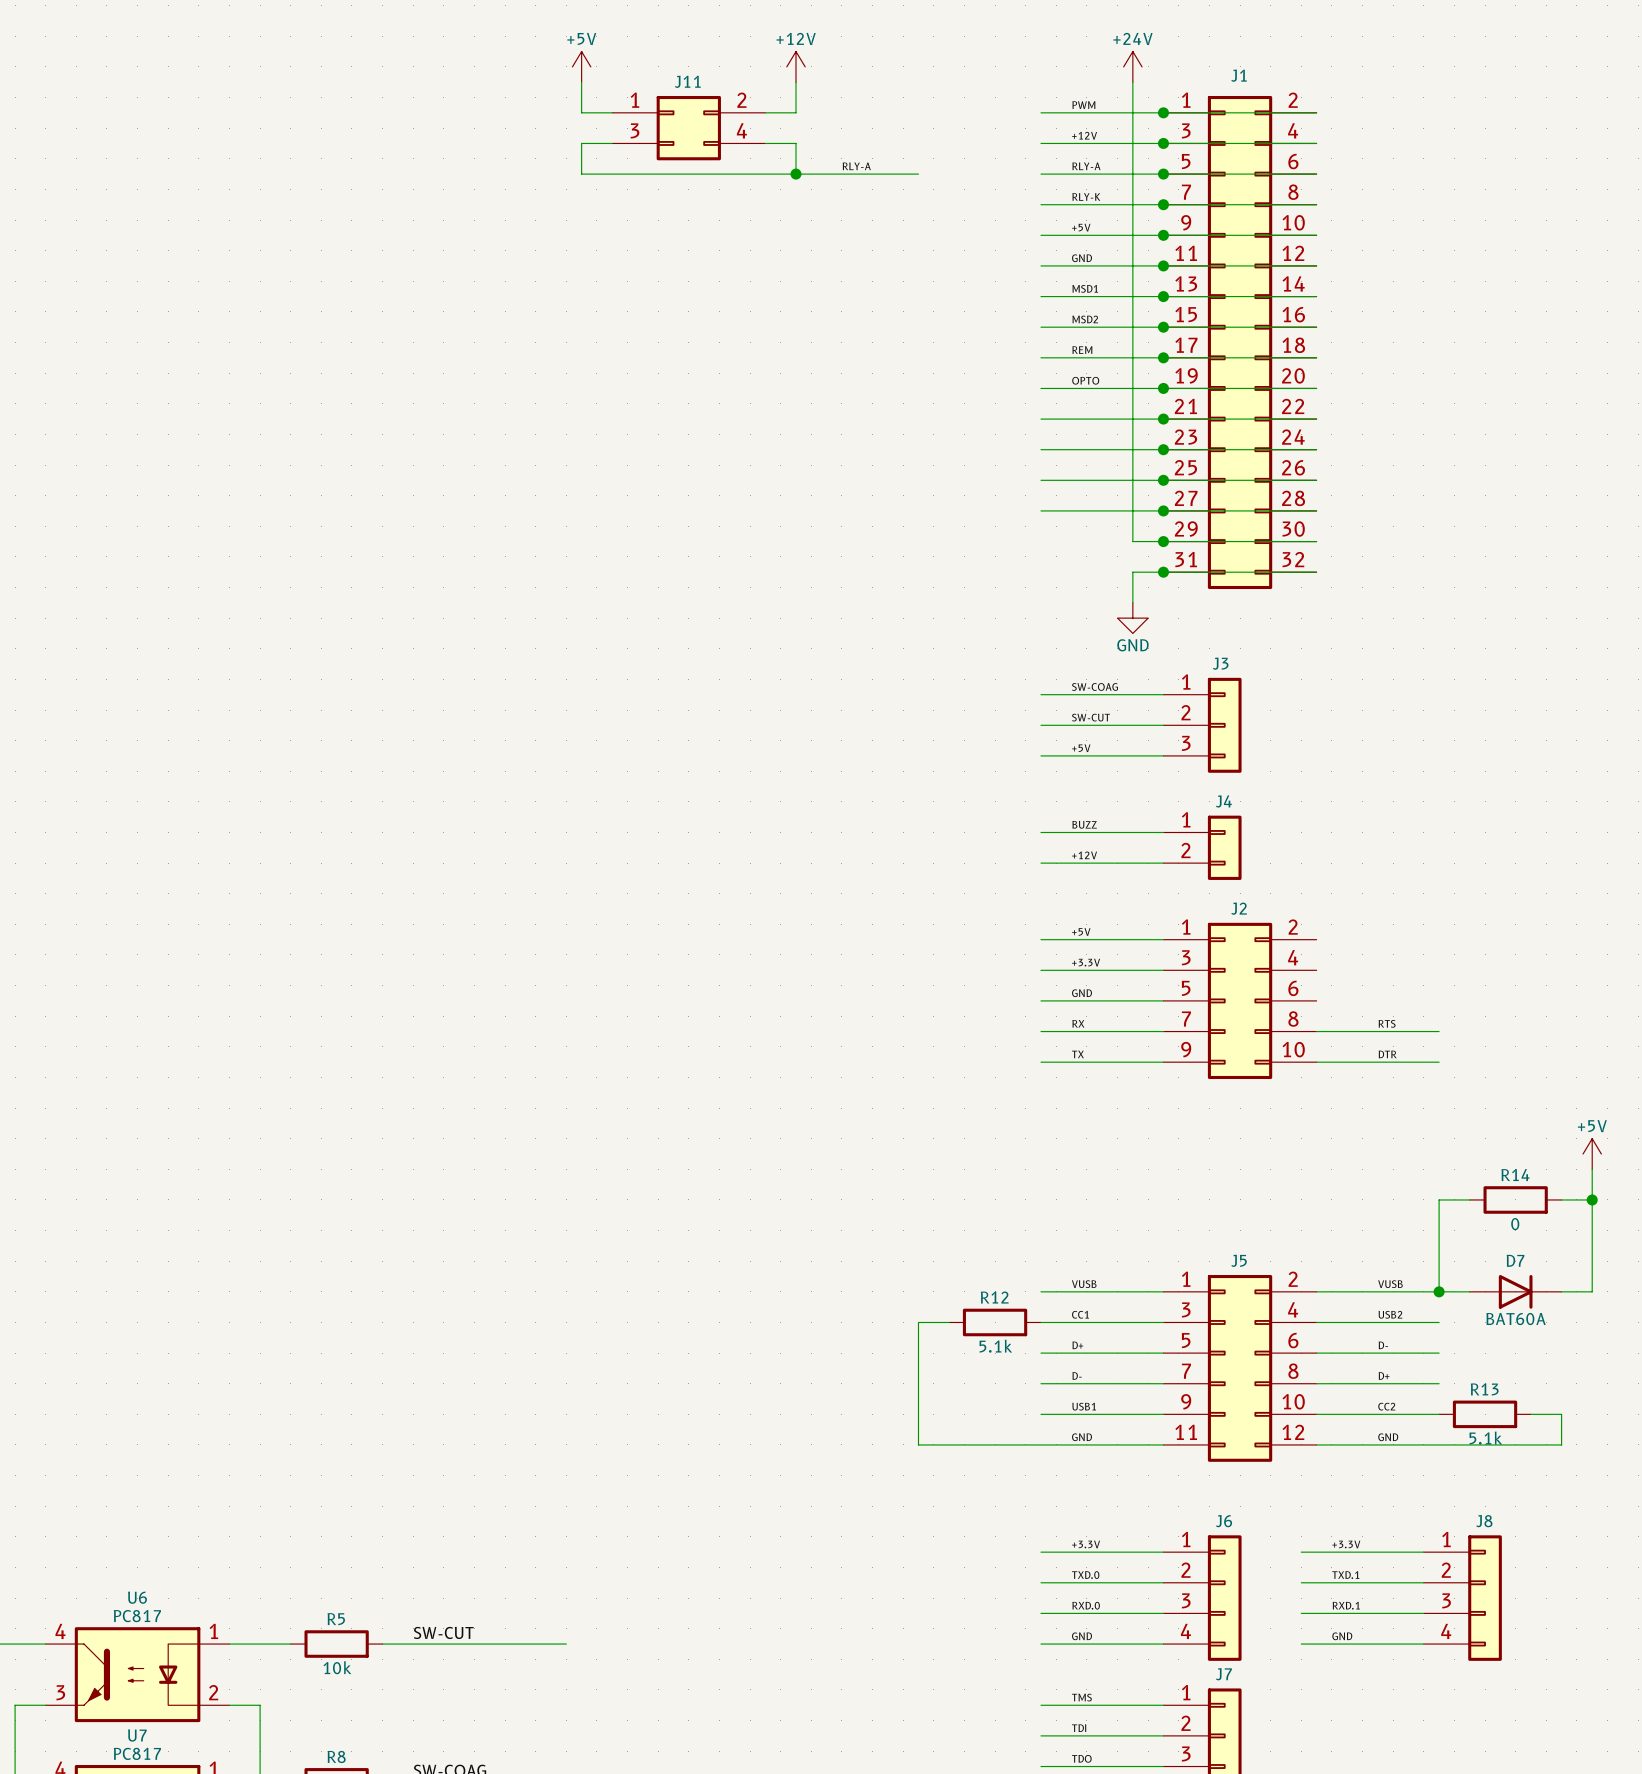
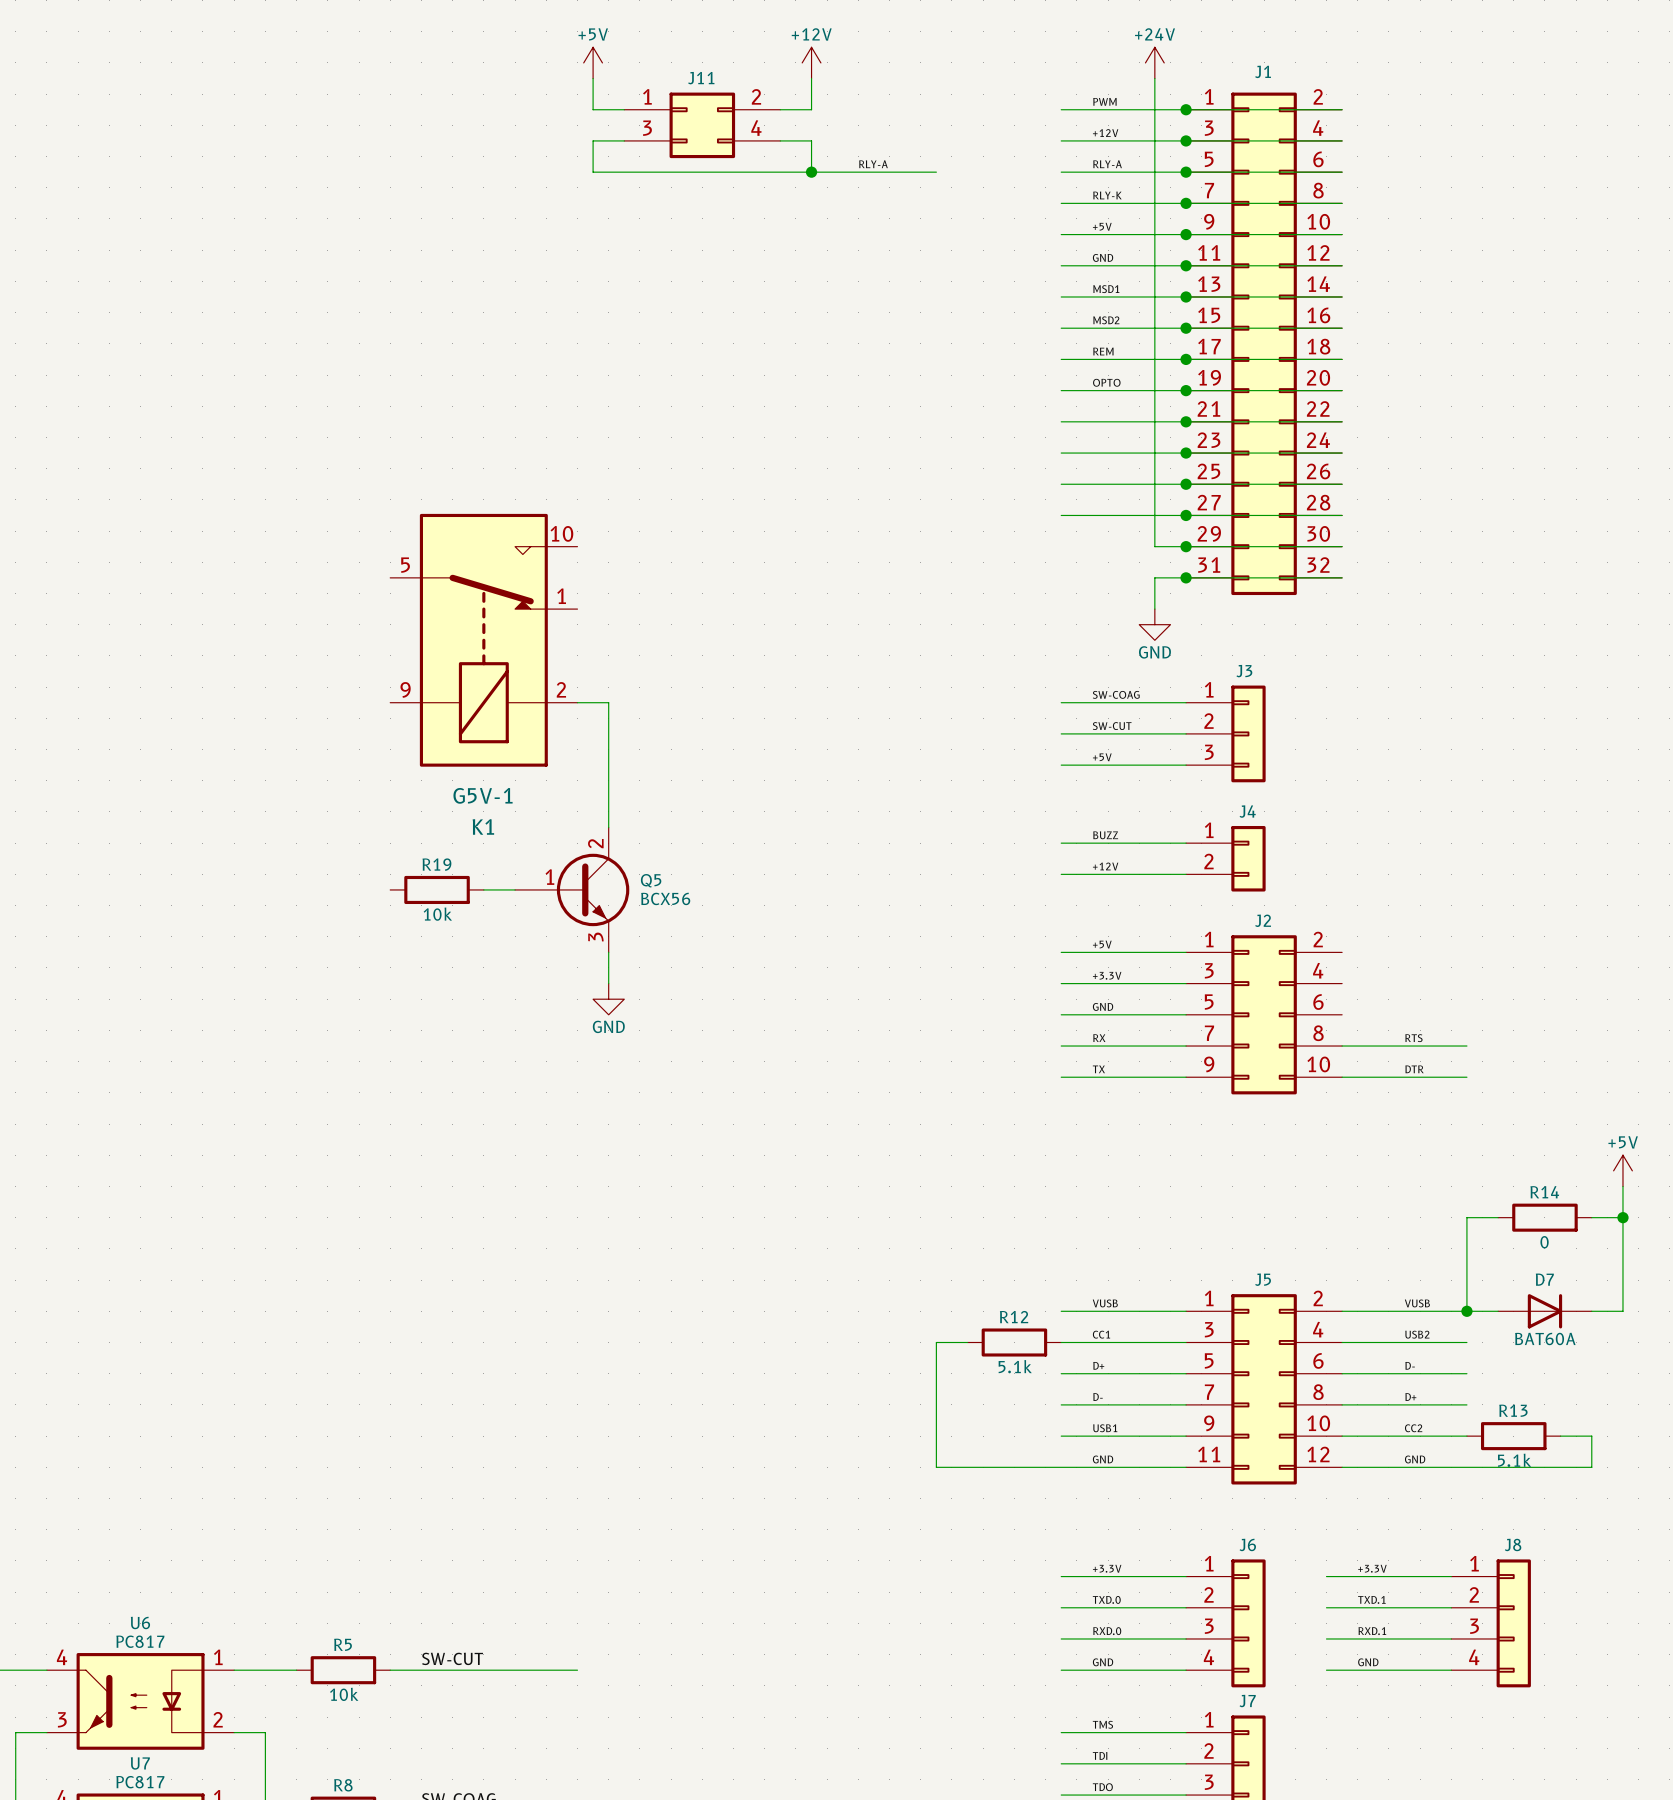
K1: none -> G5V-1 (483, 640)
wire: none -> (577, 702) (608, 702) (608, 827)
R19: none -> 10k (437, 889)
wire: none -> (483, 889) (515, 889)
Q5: none -> BCX56 (572, 889)
wire: none -> (608, 952) (608, 983)
power symbol: none -> GND (608, 999)

